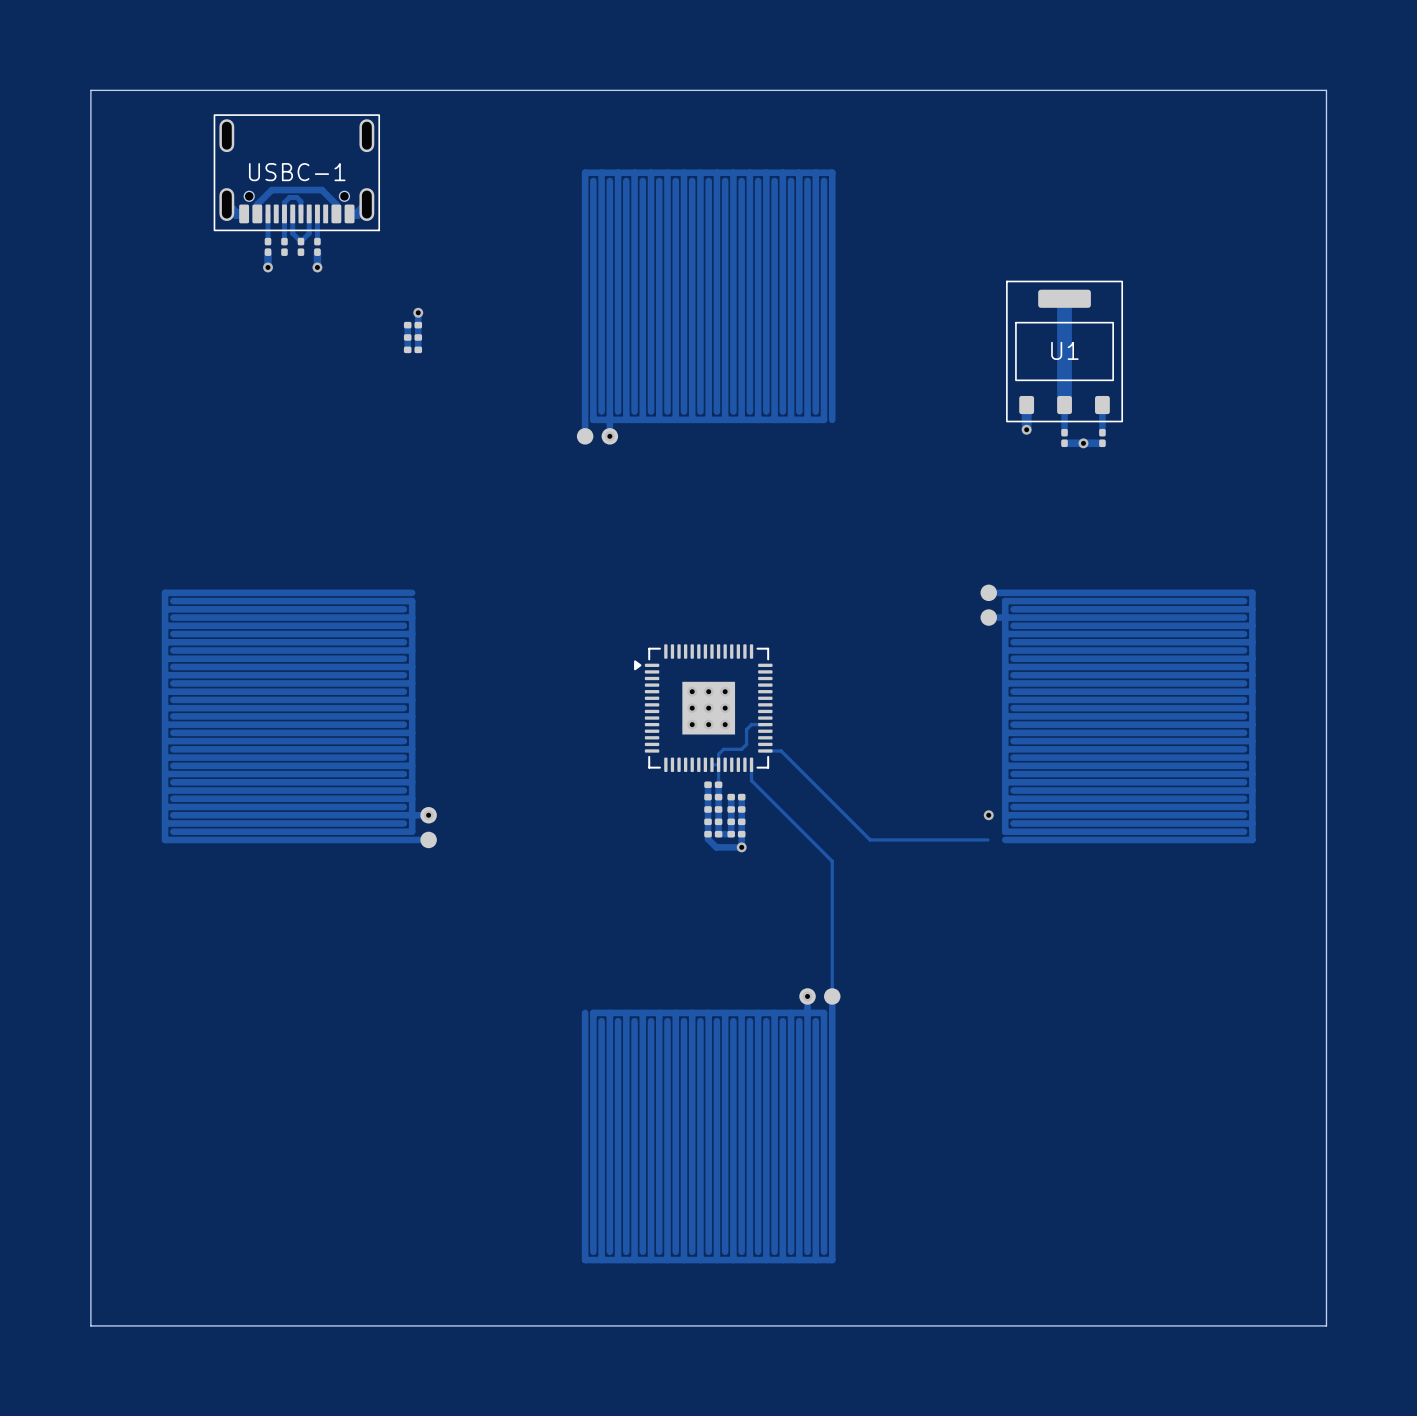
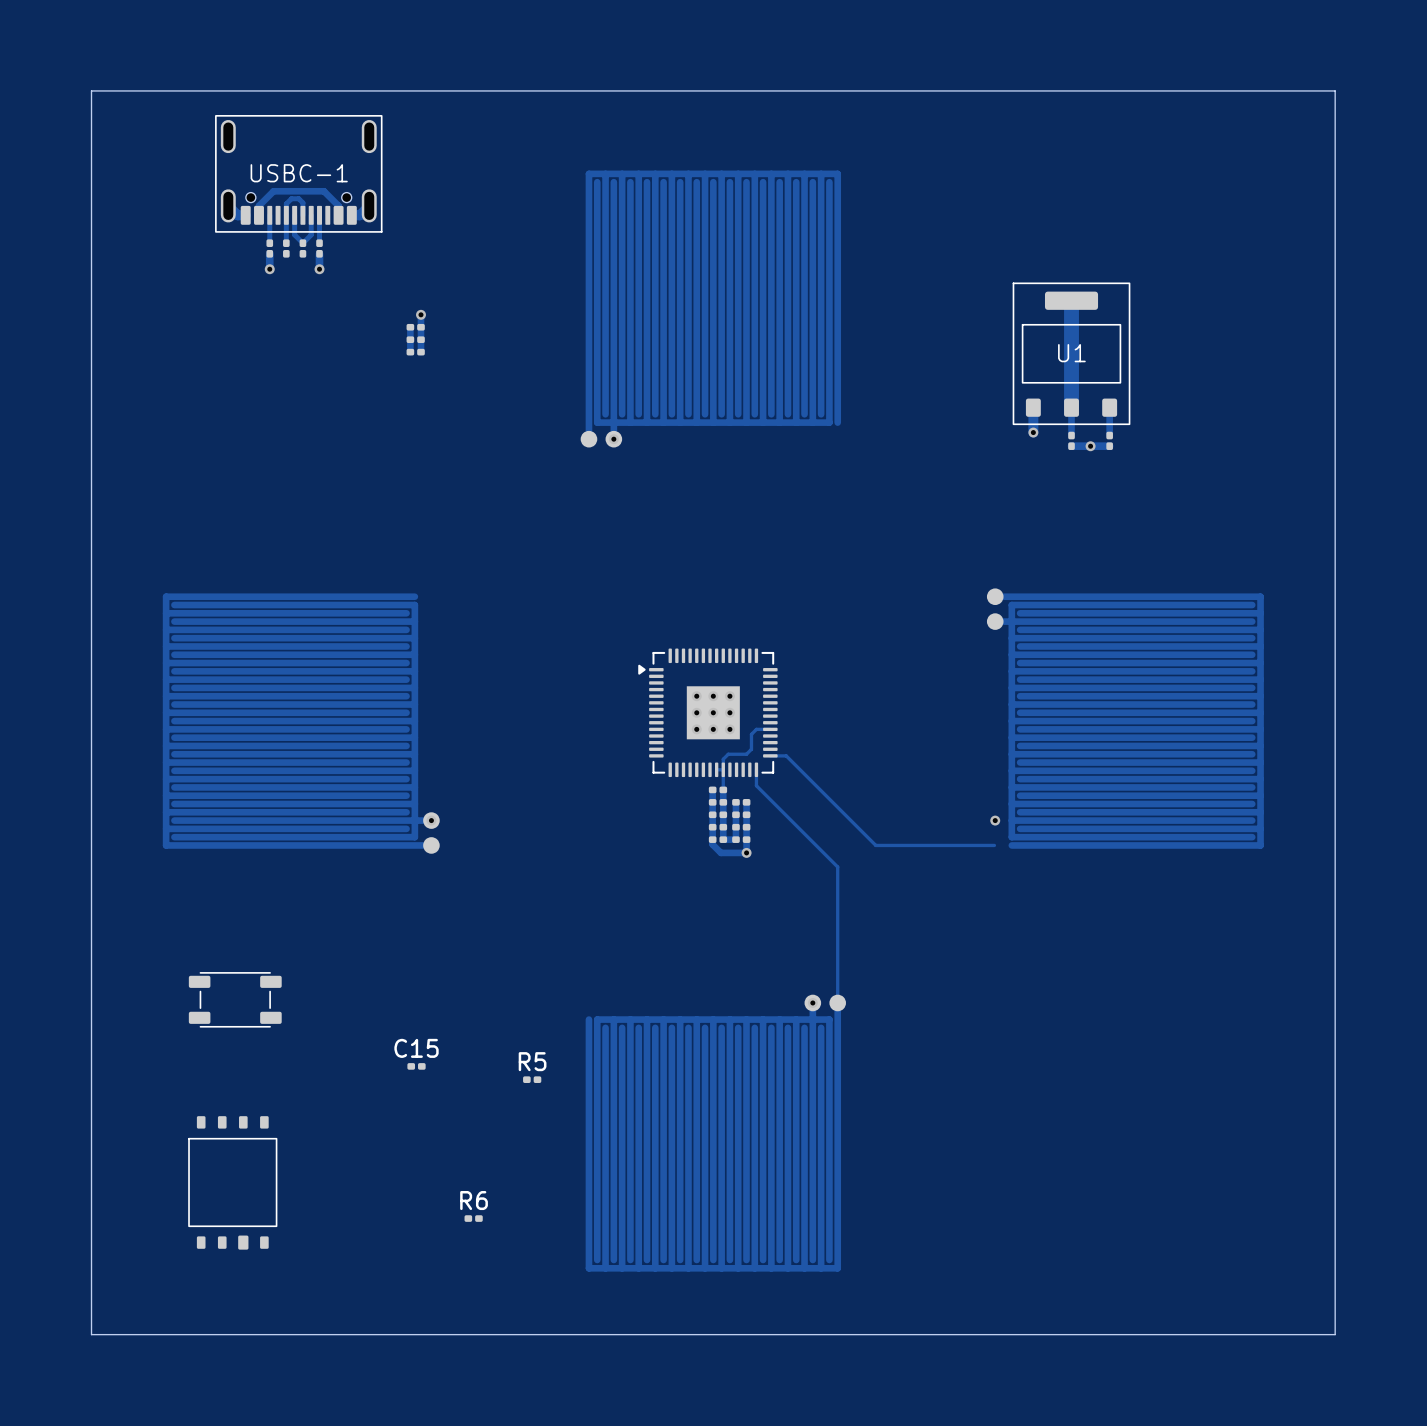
part: none -> (235, 999)
C15: none -> (416, 1066)
R5: none -> (532, 1079)
part: none -> (232, 1182)
R6: none -> (473, 1218)

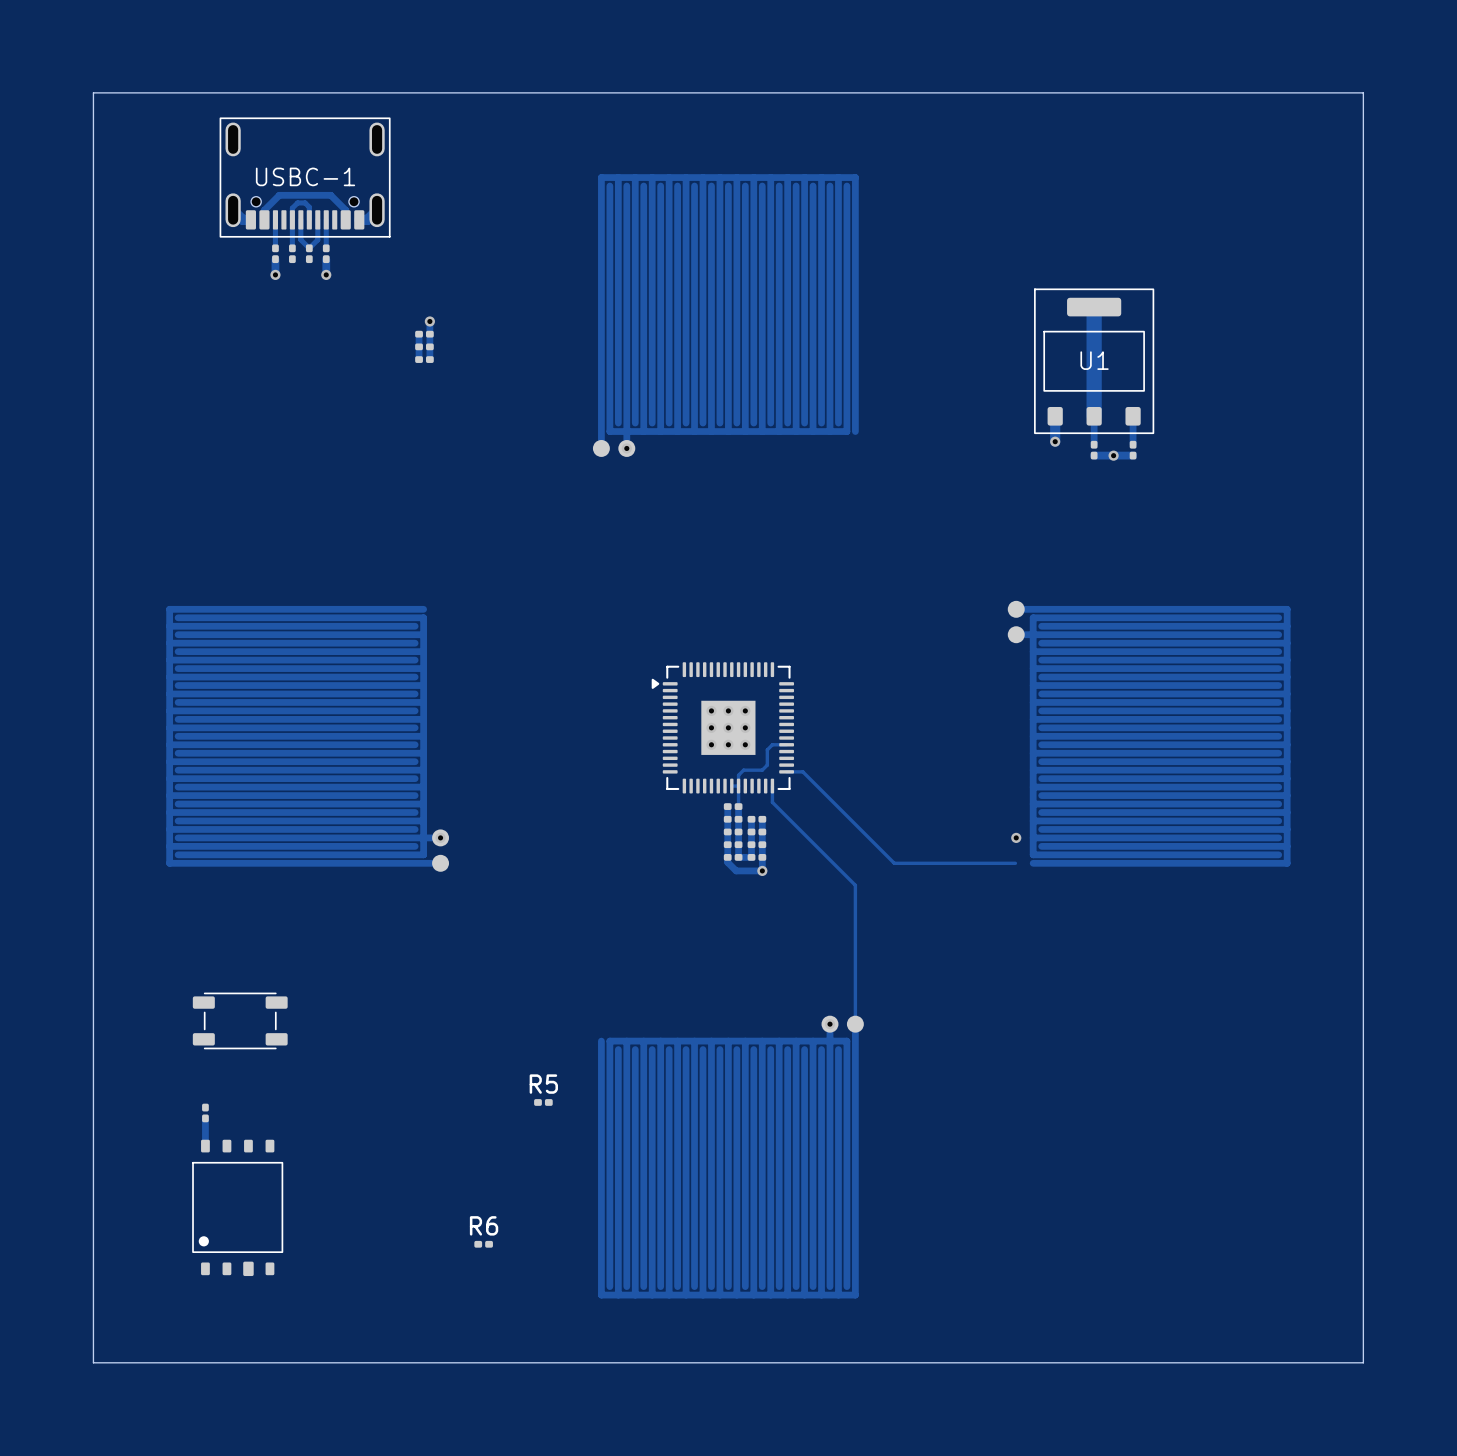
C15: (416, 1066) -> none
part: none -> (205, 1112)
track: none -> (205, 1118) (205, 1146)
part footprint: [188, 1116, 278, 1250] -> [192, 1139, 284, 1277]

